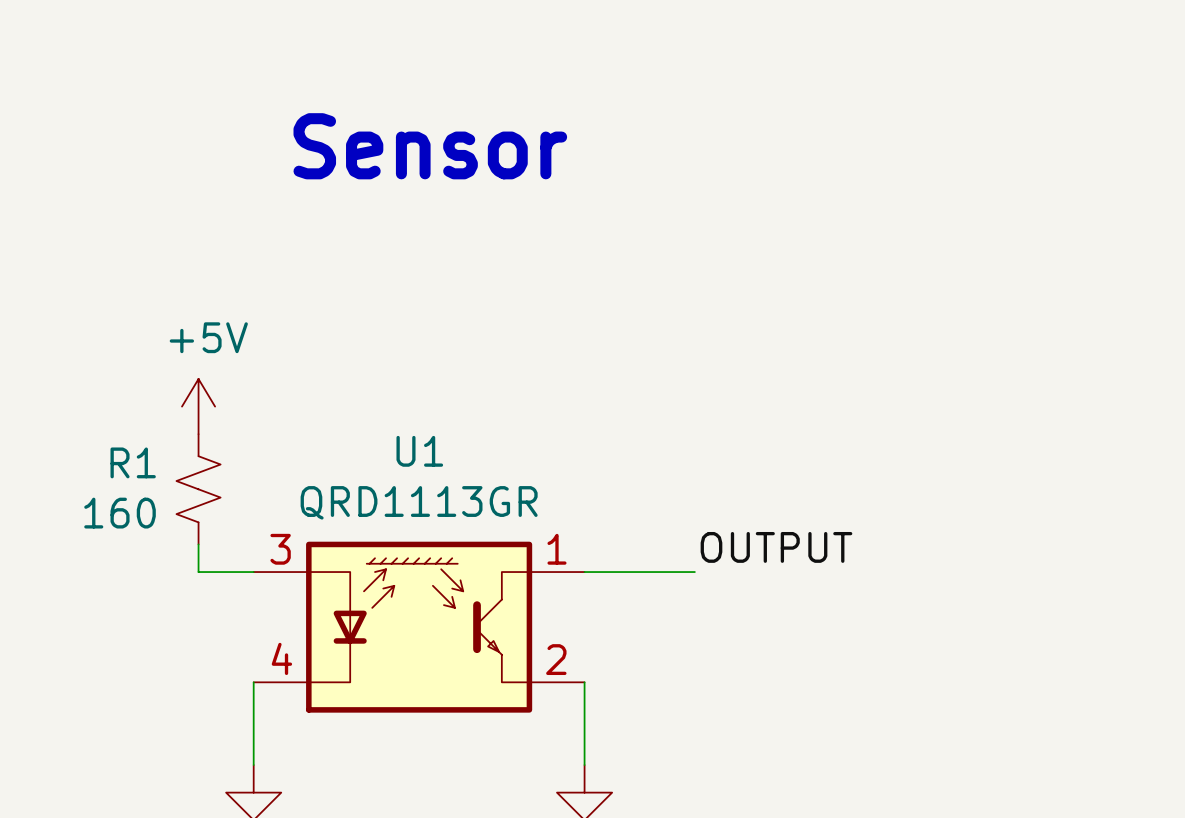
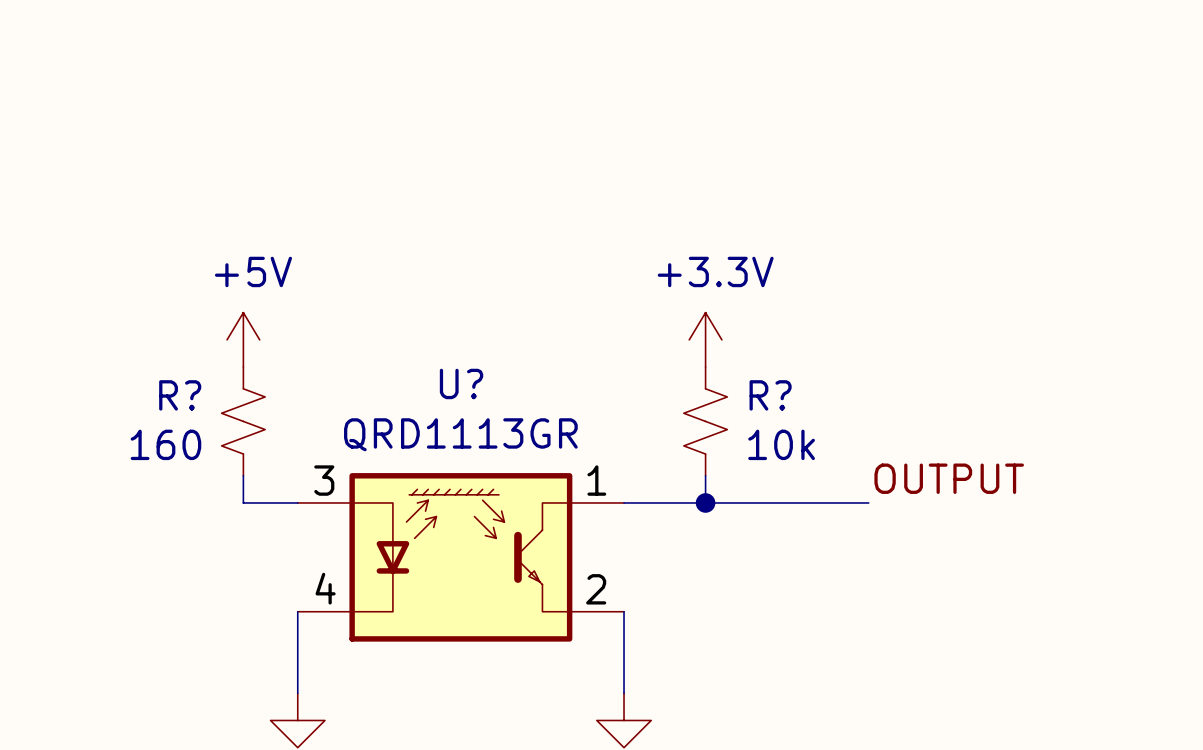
text: Sensor (430, 146) -> none
power symbol: none -> +3.3V (705, 339)
U1 name: U1 (419, 451) -> U? (461, 383)
R1 name: R1 (133, 462) -> R? (180, 395)
R?: none -> 10k (705, 421)
wire: none -> (705, 475) (705, 502)
label position: OUTPUT (776, 547) -> OUTPUT (949, 478)
junction: none -> (705, 502)
wire: none -> (732, 502) (868, 502)

